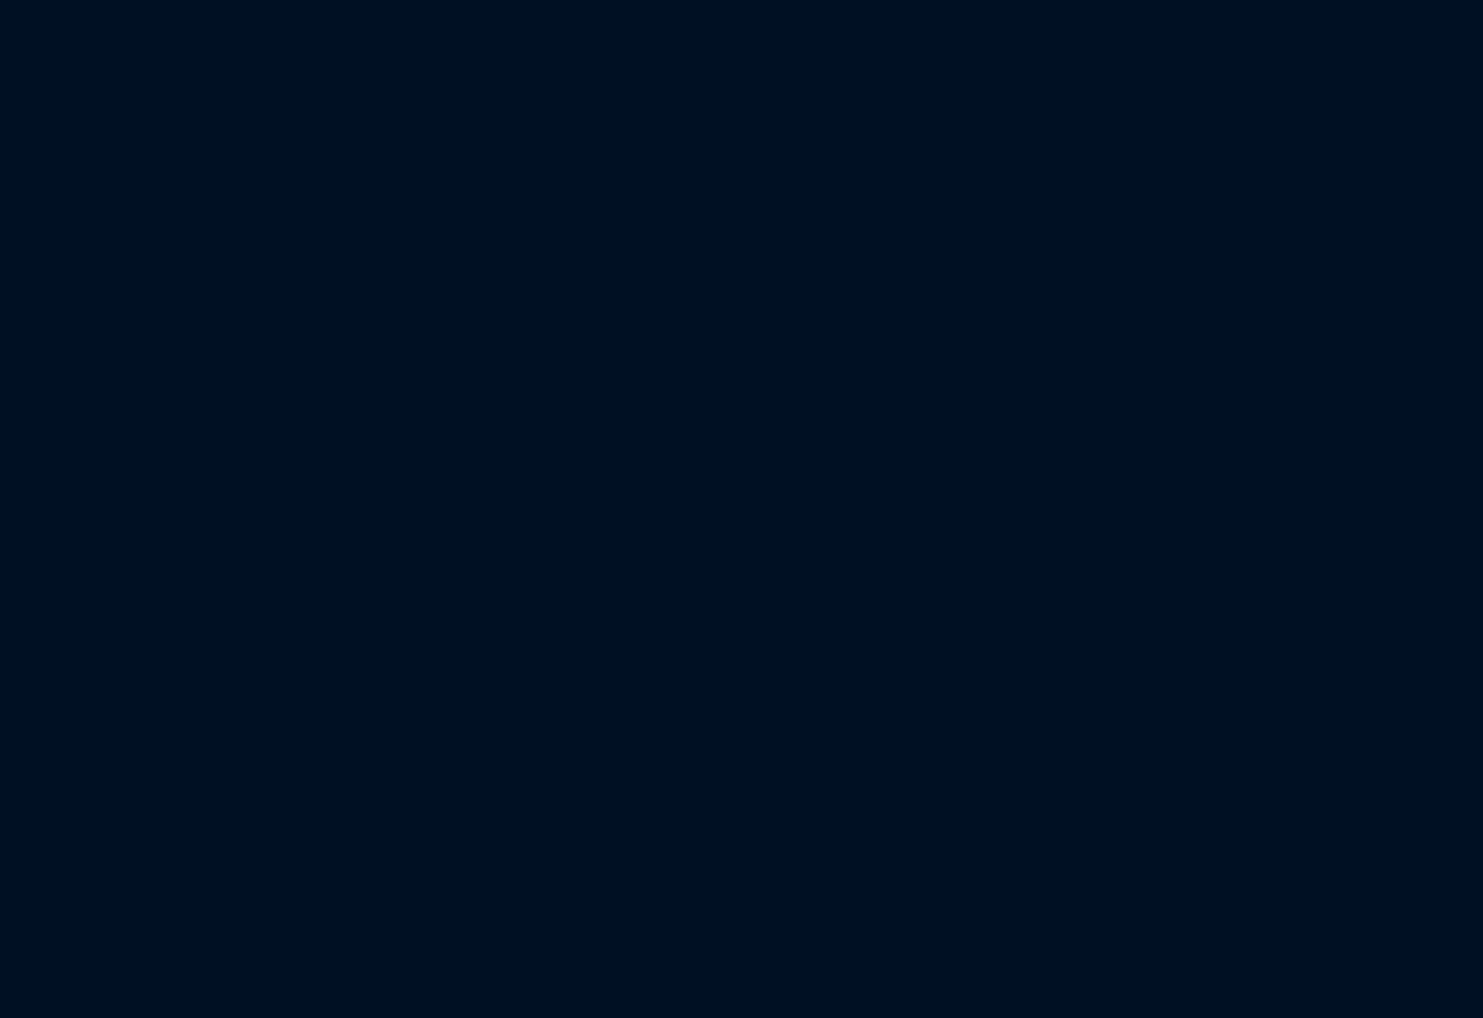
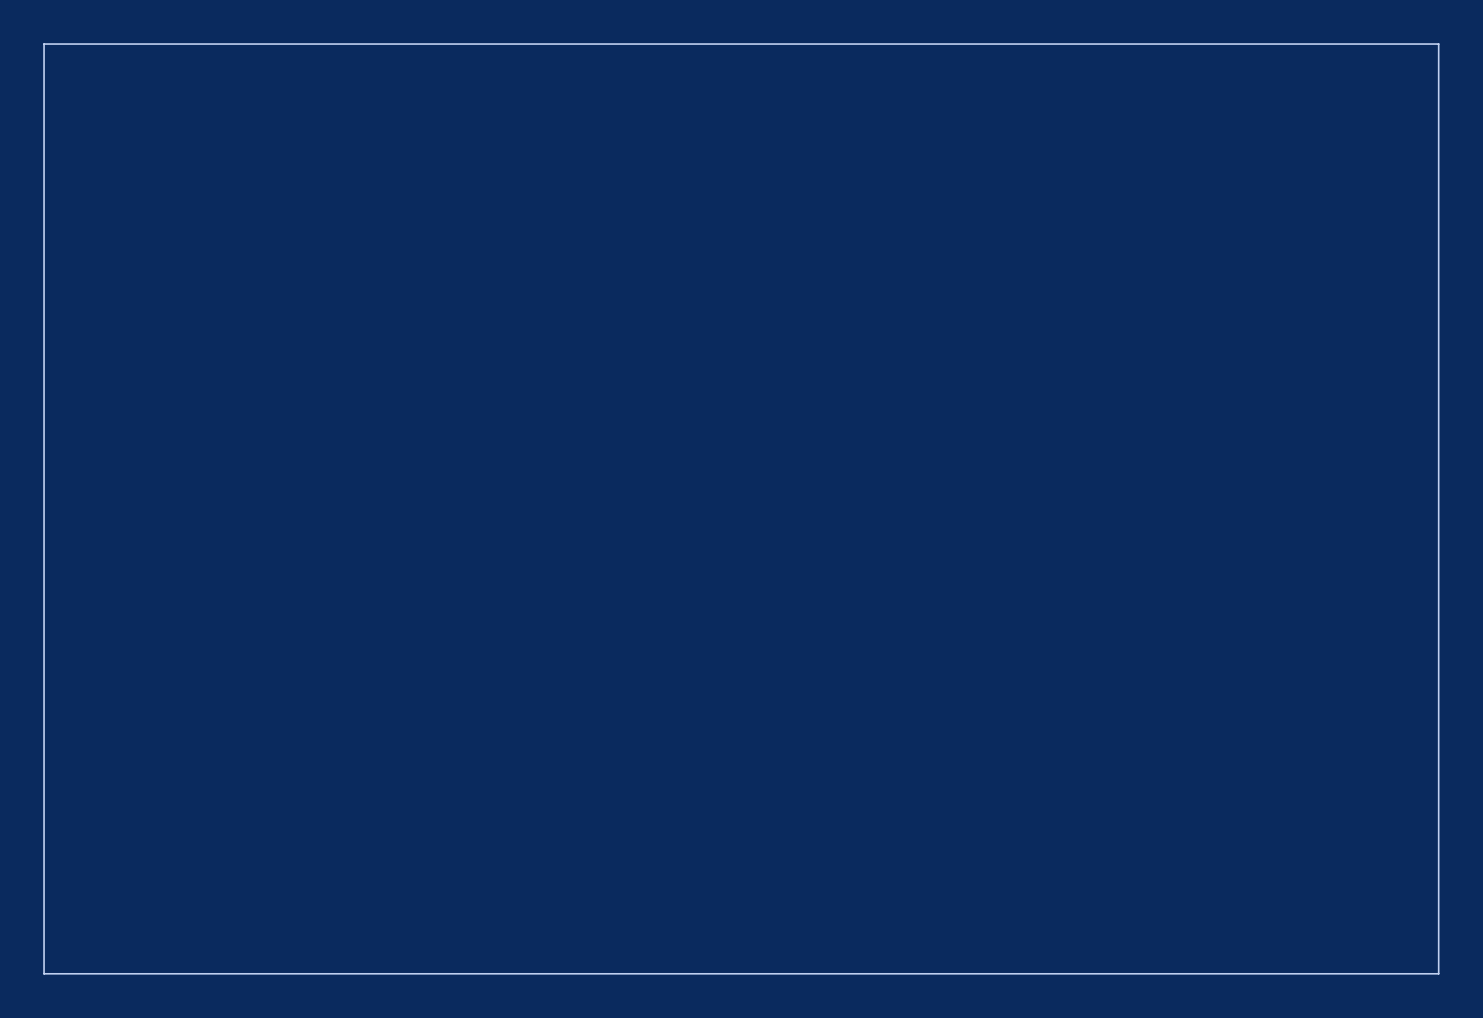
board edge: none -> (44, 44) (1438, 44) (1438, 973) (44, 973) (44, 44)

